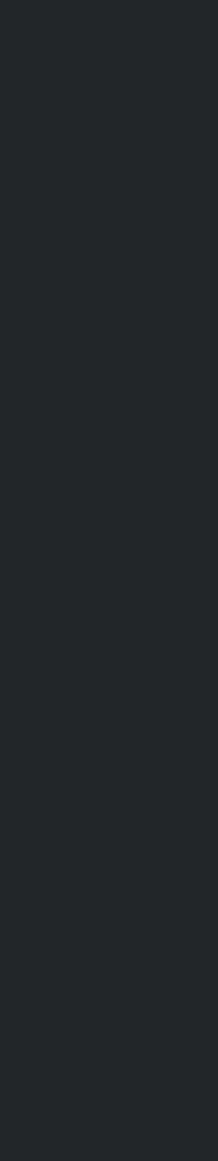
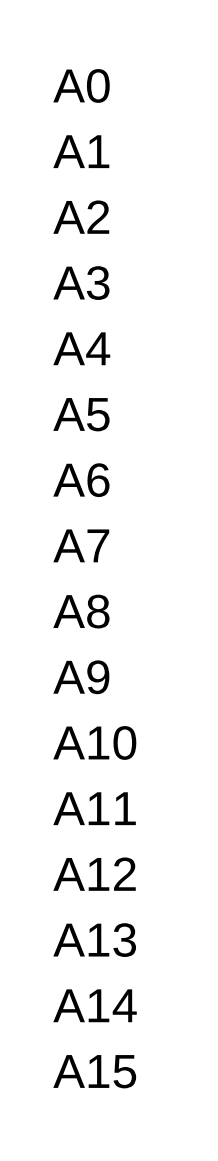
label: none -> A0 (81, 85)
label: none -> A1 (81, 151)
label: none -> A2 (81, 217)
label: none -> A3 (81, 283)
label: none -> A4 (81, 348)
label: none -> A5 (81, 414)
label: none -> A6 (81, 480)
label: none -> A7 (81, 545)
label: none -> A8 (81, 611)
label: none -> A9 (81, 677)
label: none -> A10 (94, 742)
label: none -> A11 (94, 808)
label: none -> A12 (94, 874)
label: none -> A13 (94, 940)
label: none -> A14 (95, 1005)
label: none -> A15 (94, 1071)

